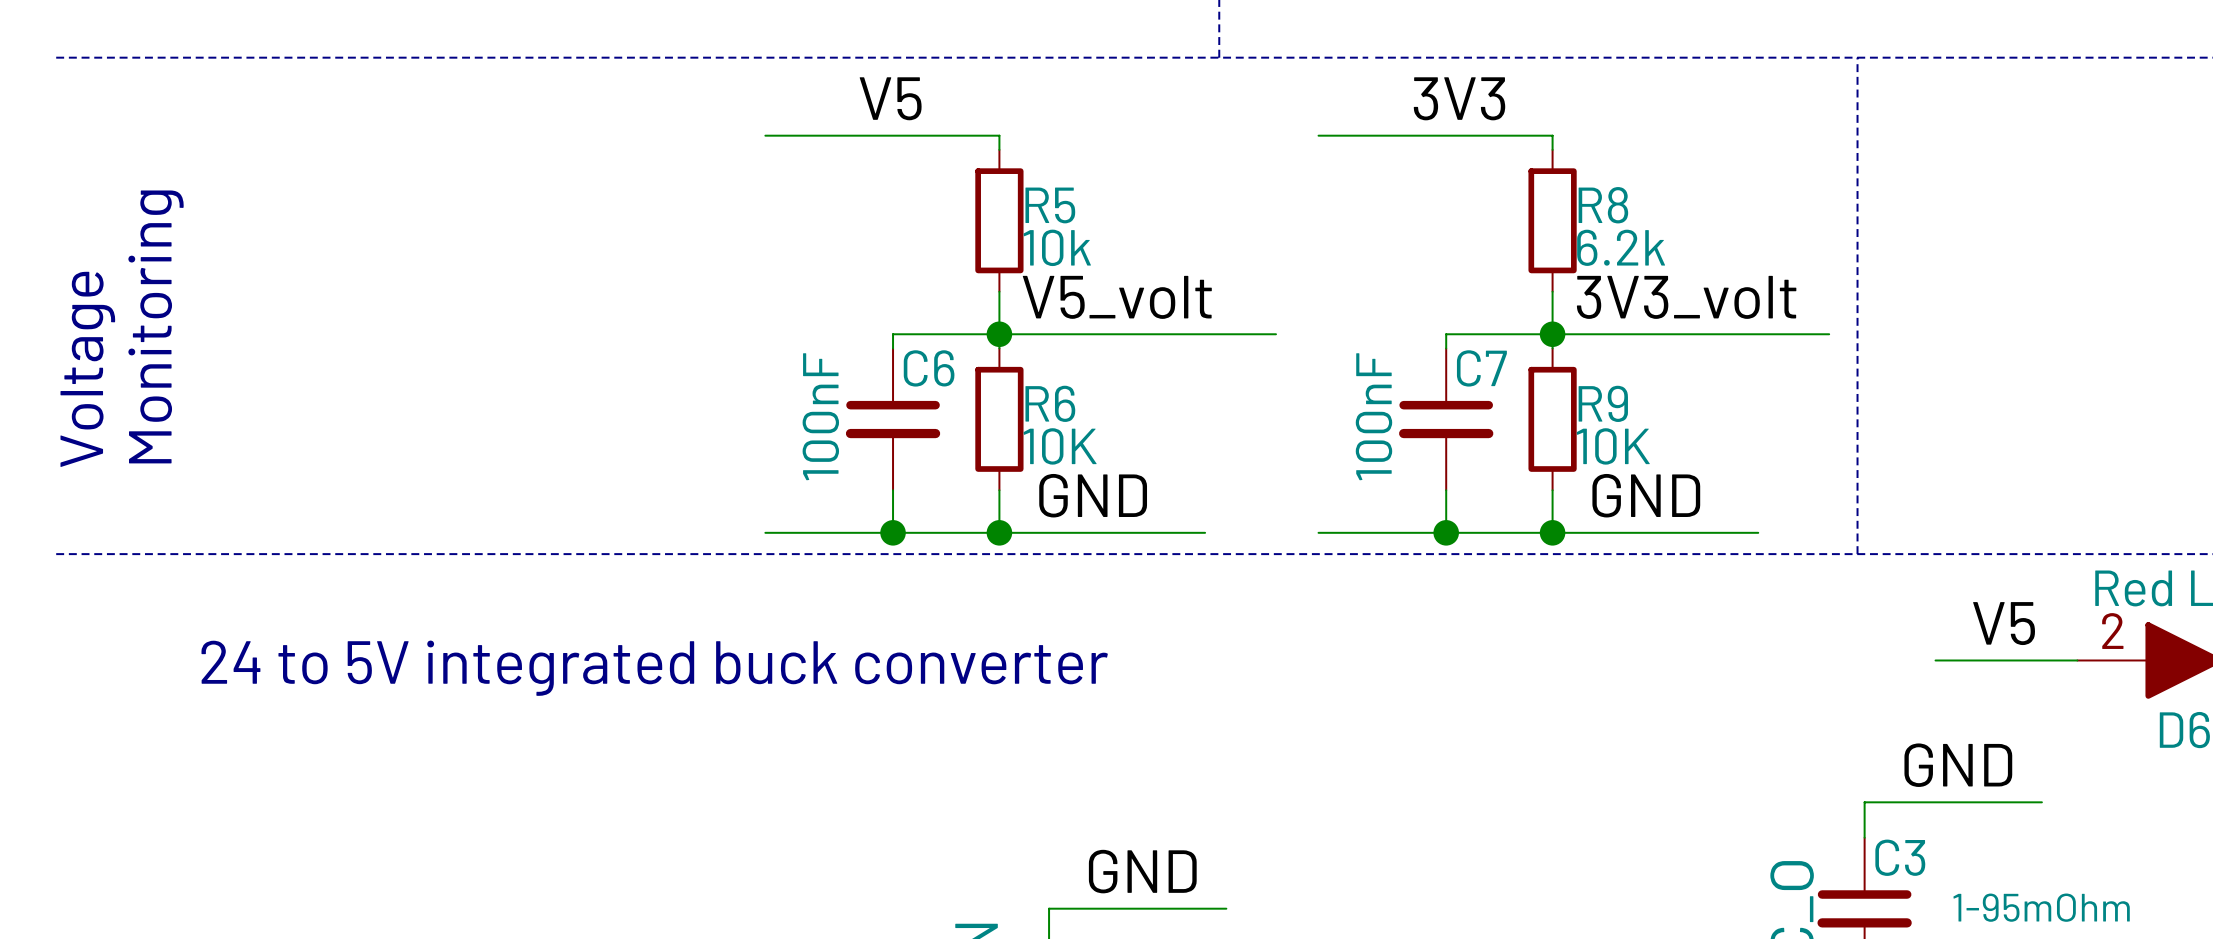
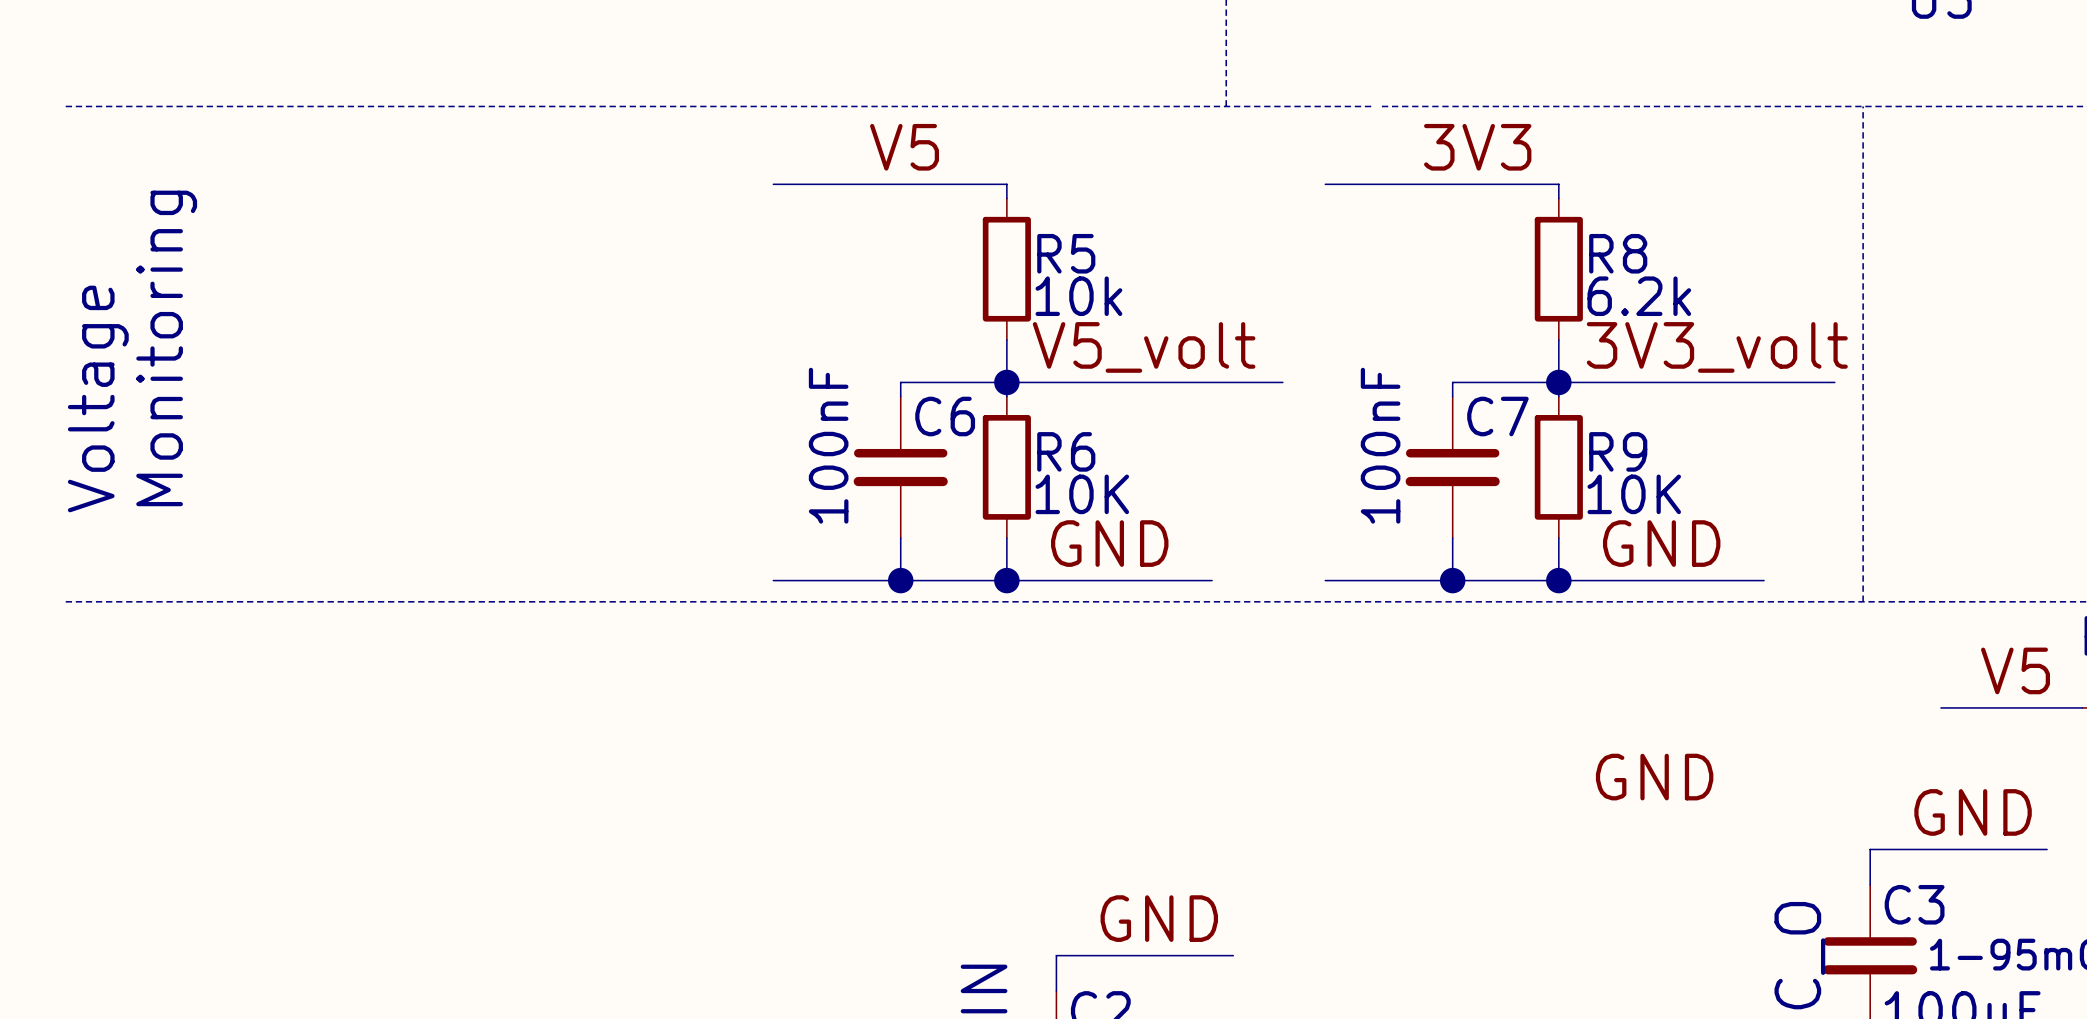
text: 24 to 5V integrated buck converter (654, 668) -> none
label: none -> GND (1654, 777)

